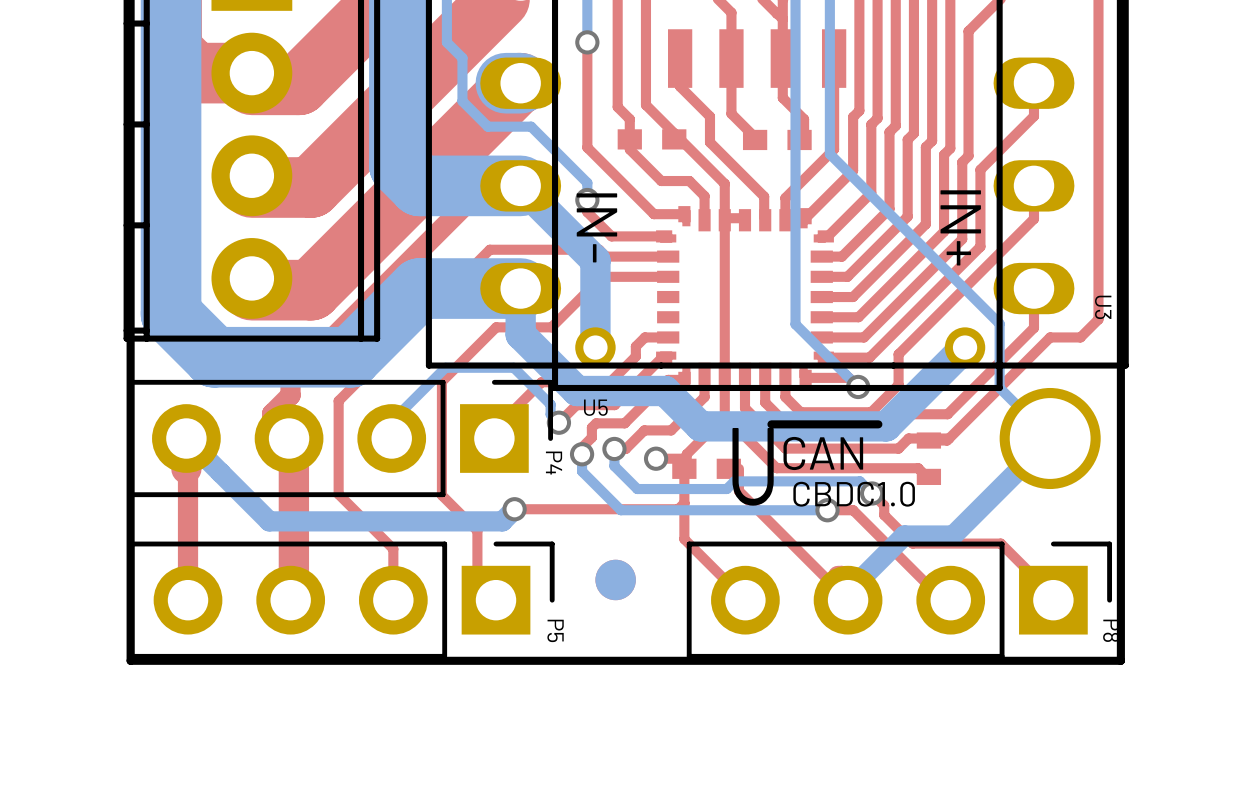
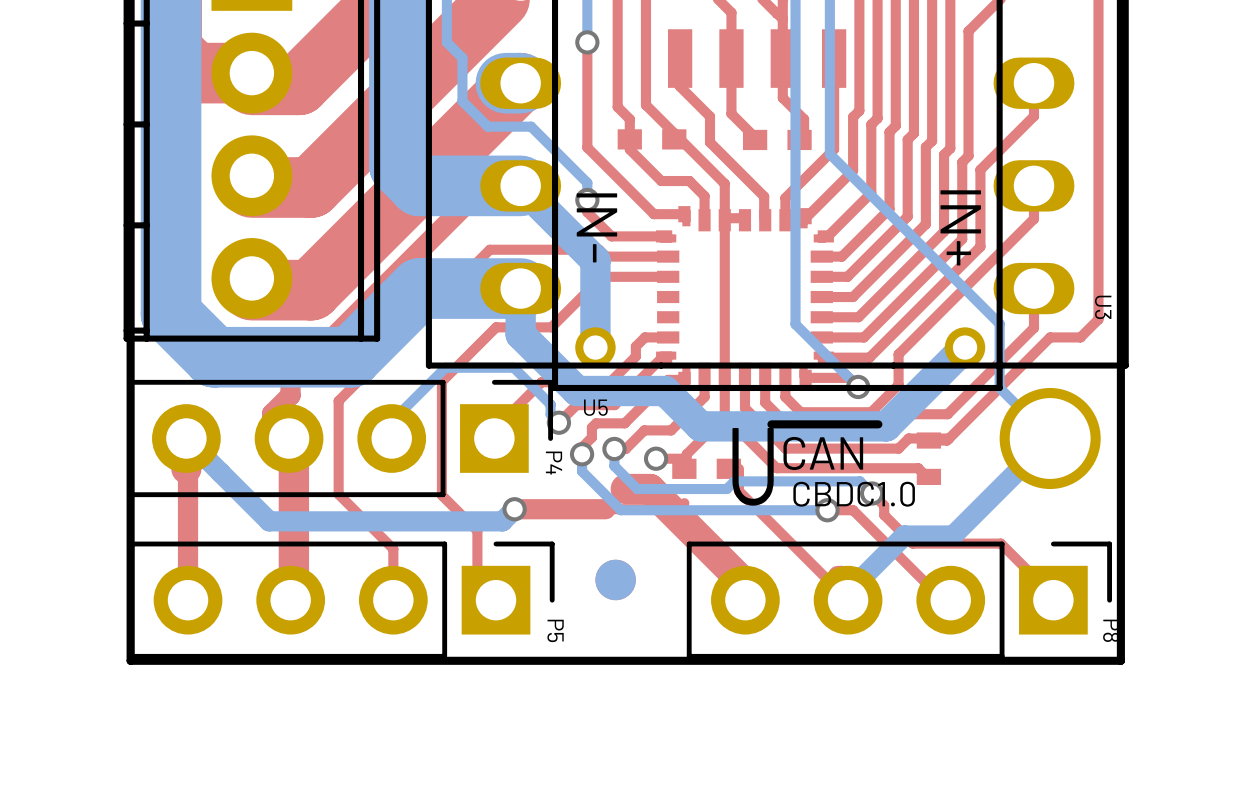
top track: (684, 468) (684, 539) (745, 600) -> none
top track: none -> (625, 489) (650, 489) (745, 584)
top track width: thin (605, 509) (514, 509) -> thick (605, 509) (514, 509)

